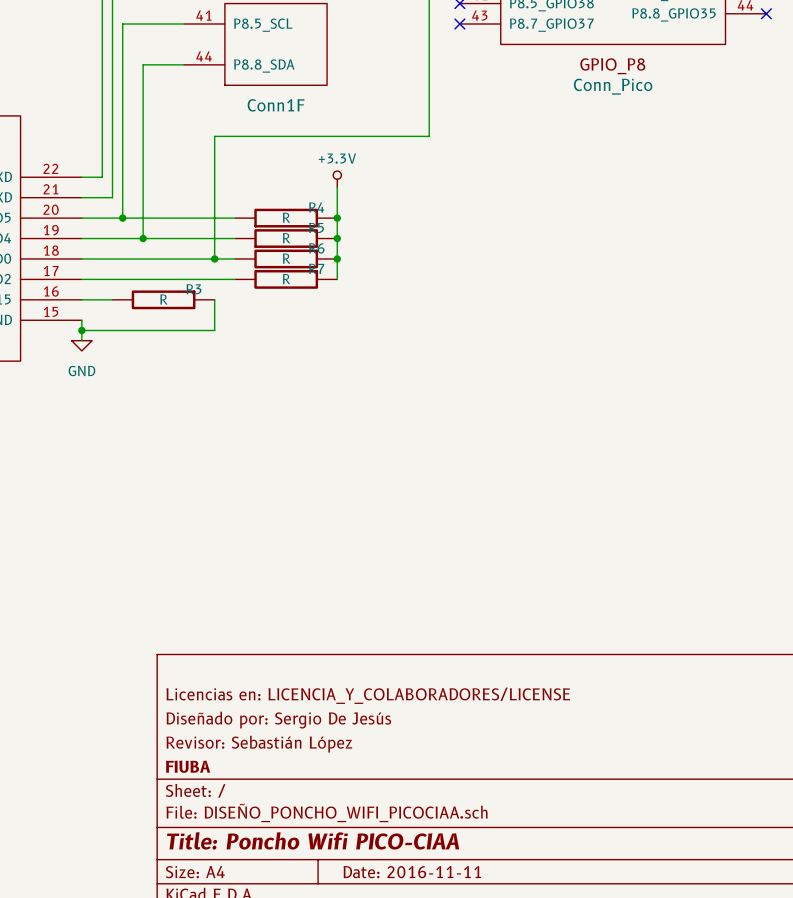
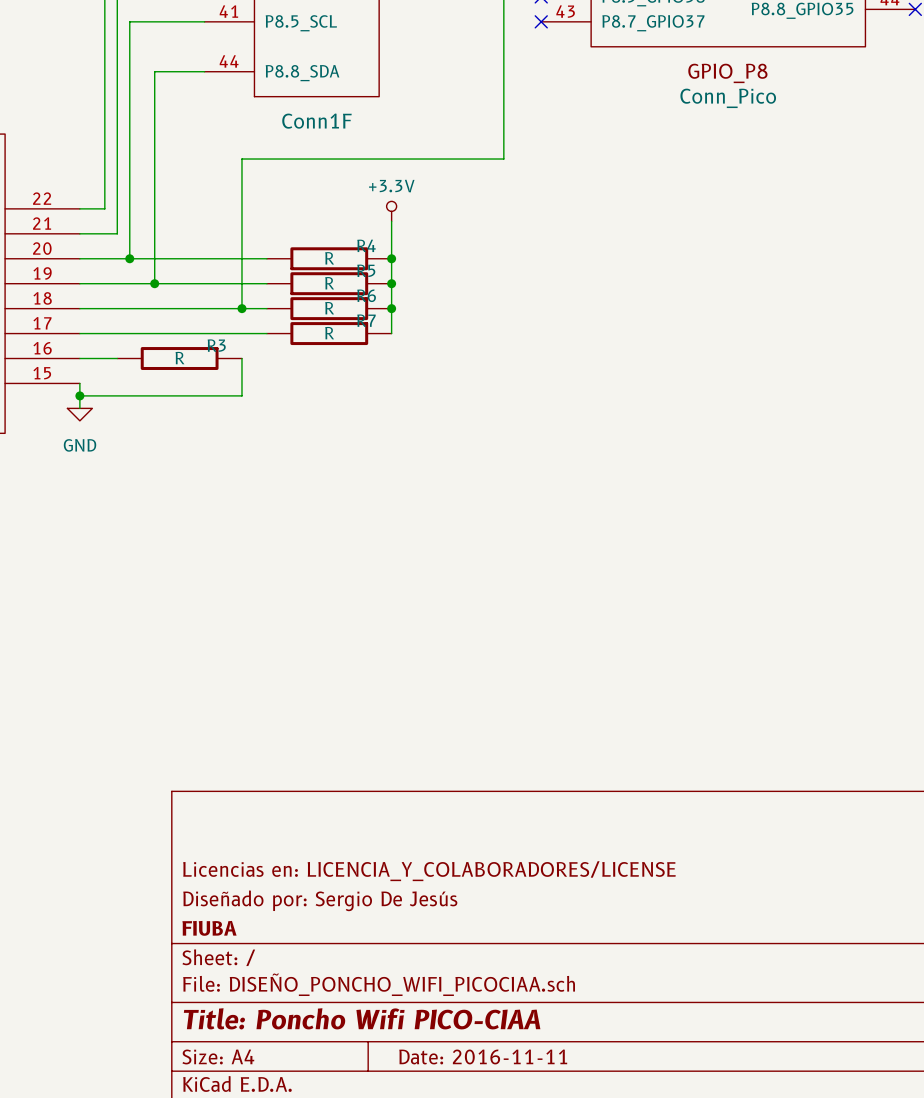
title block: Licencias en: LICENCIA_Y_COLABORADORES/LICENSE (368, 695) -> none
title block: Diseñado por: Sergio De Jesús (278, 720) -> Licencias en: LICENCIA_Y_COLABORADORES/LICENSE (429, 871)
title block: Revisor: Sebastián López (259, 744) -> Diseñado por: Sergio De Jesús (320, 900)

